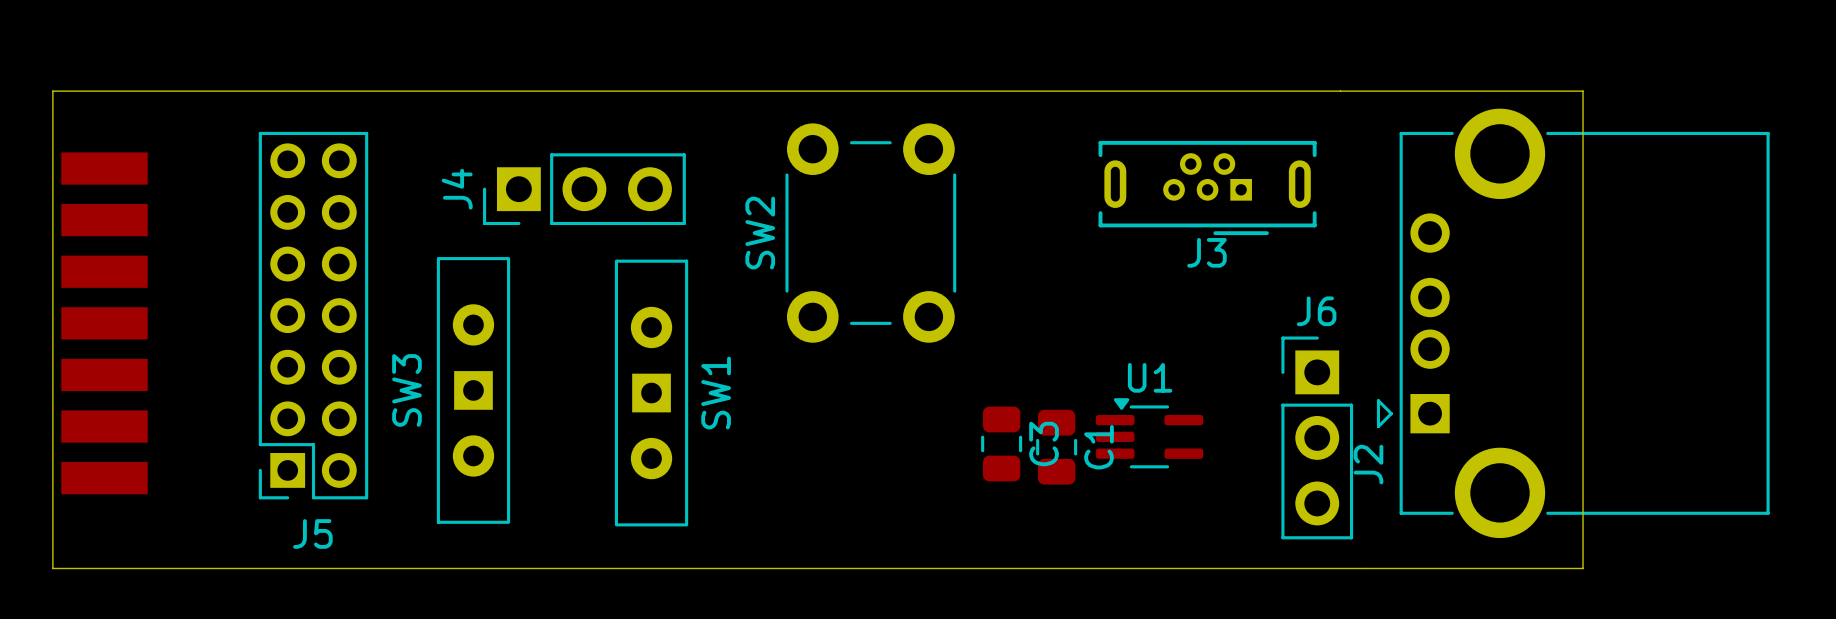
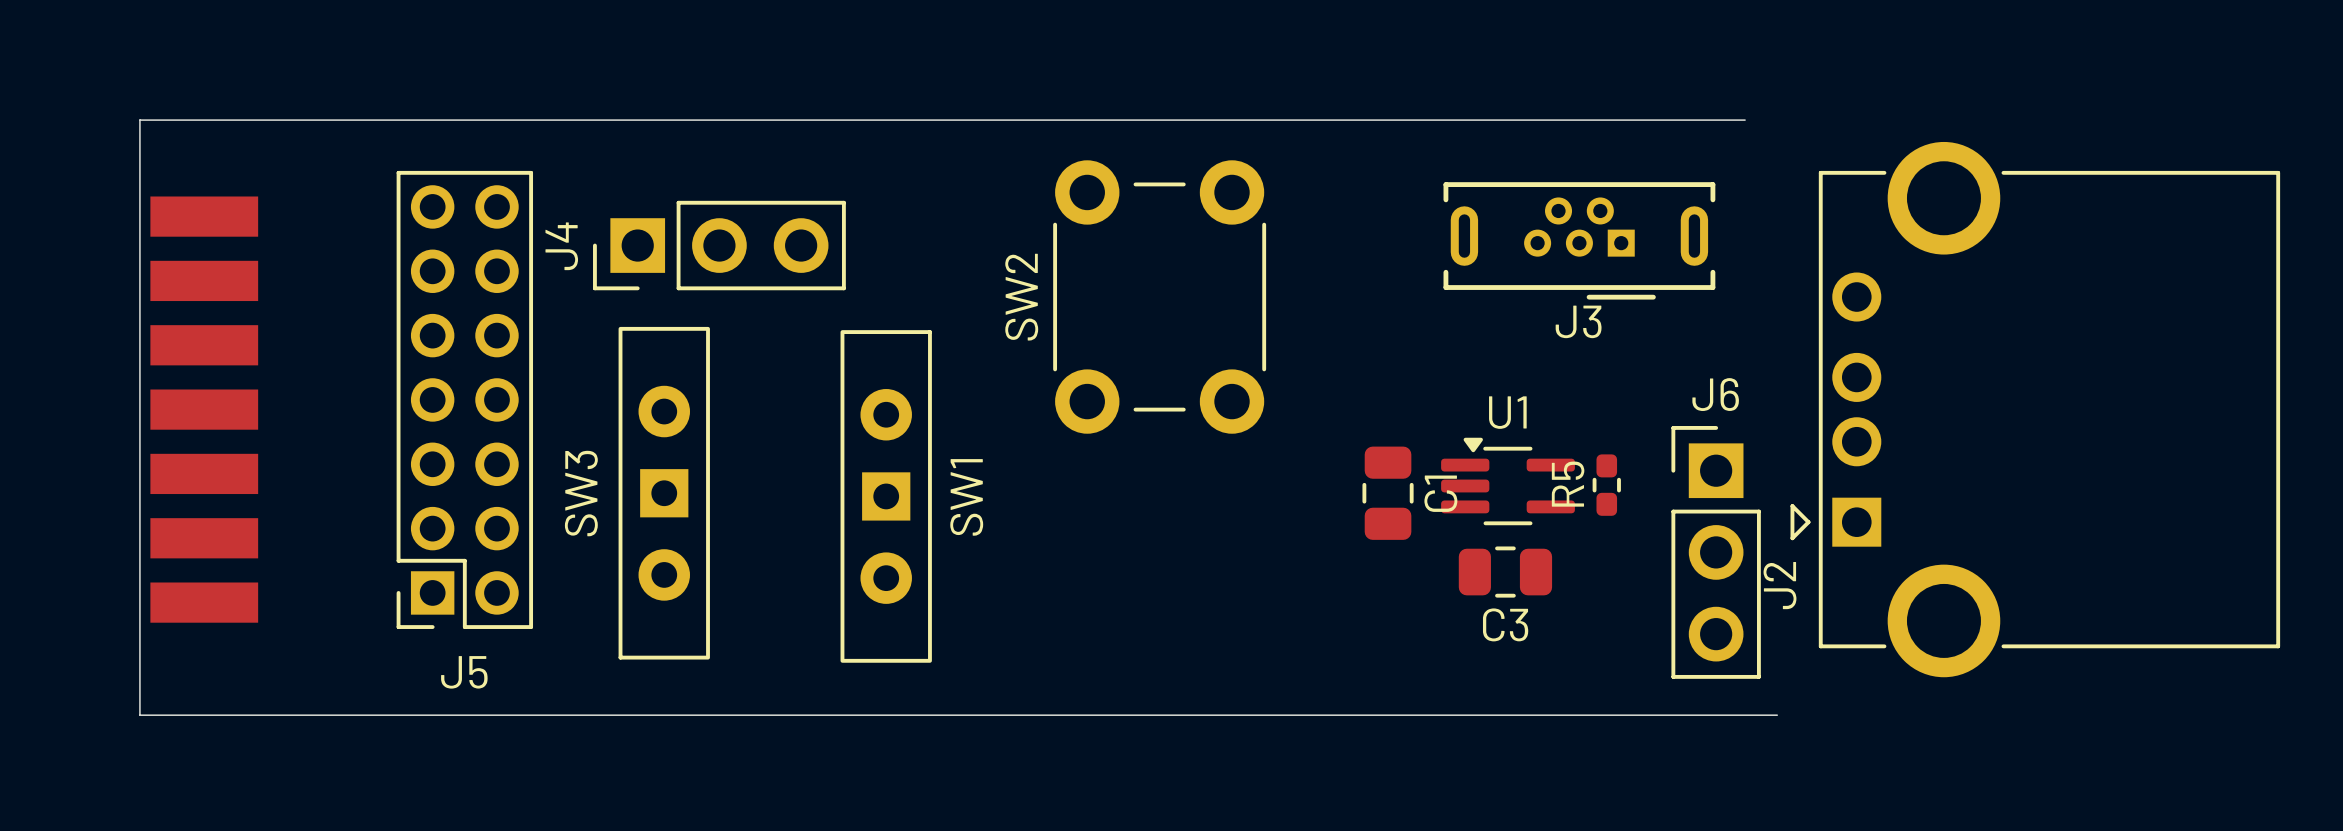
board edge: (1340, 91) (1583, 91) (1583, 568) (1366, 568) -> none
J4 position: (584, 189) -> (719, 245)
R5: none -> (1606, 485)
U1 position: (1149, 433) -> (1508, 481)
C3 rotation: 0° (1001, 443) -> 90° clockwise (1505, 572)
C3 position: (1001, 443) -> (1505, 572)
C1 position: (1056, 447) -> (1388, 493)

